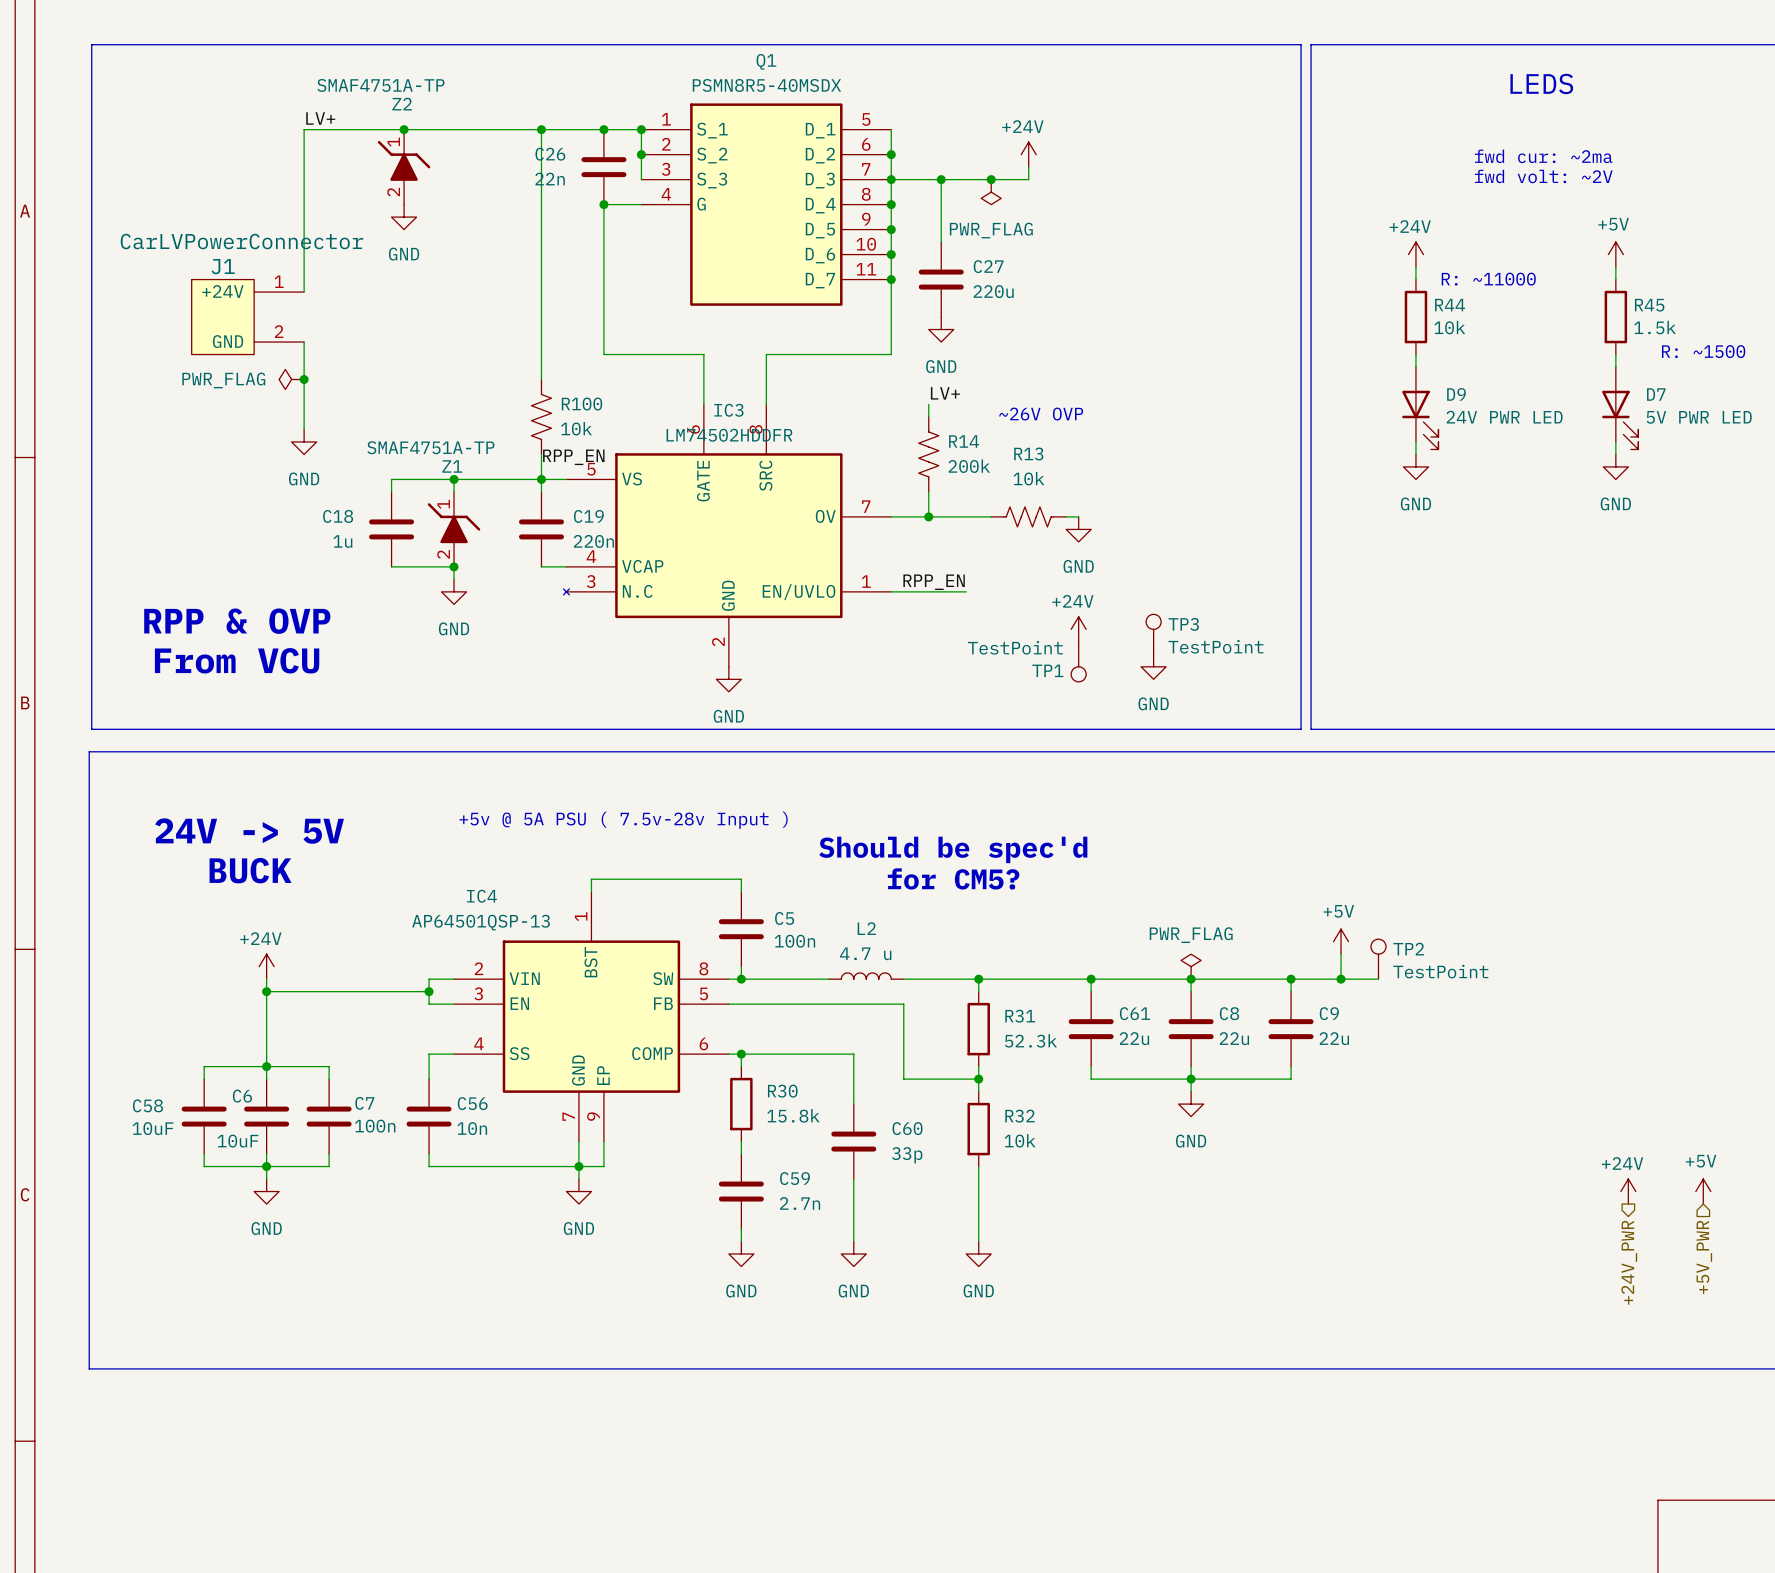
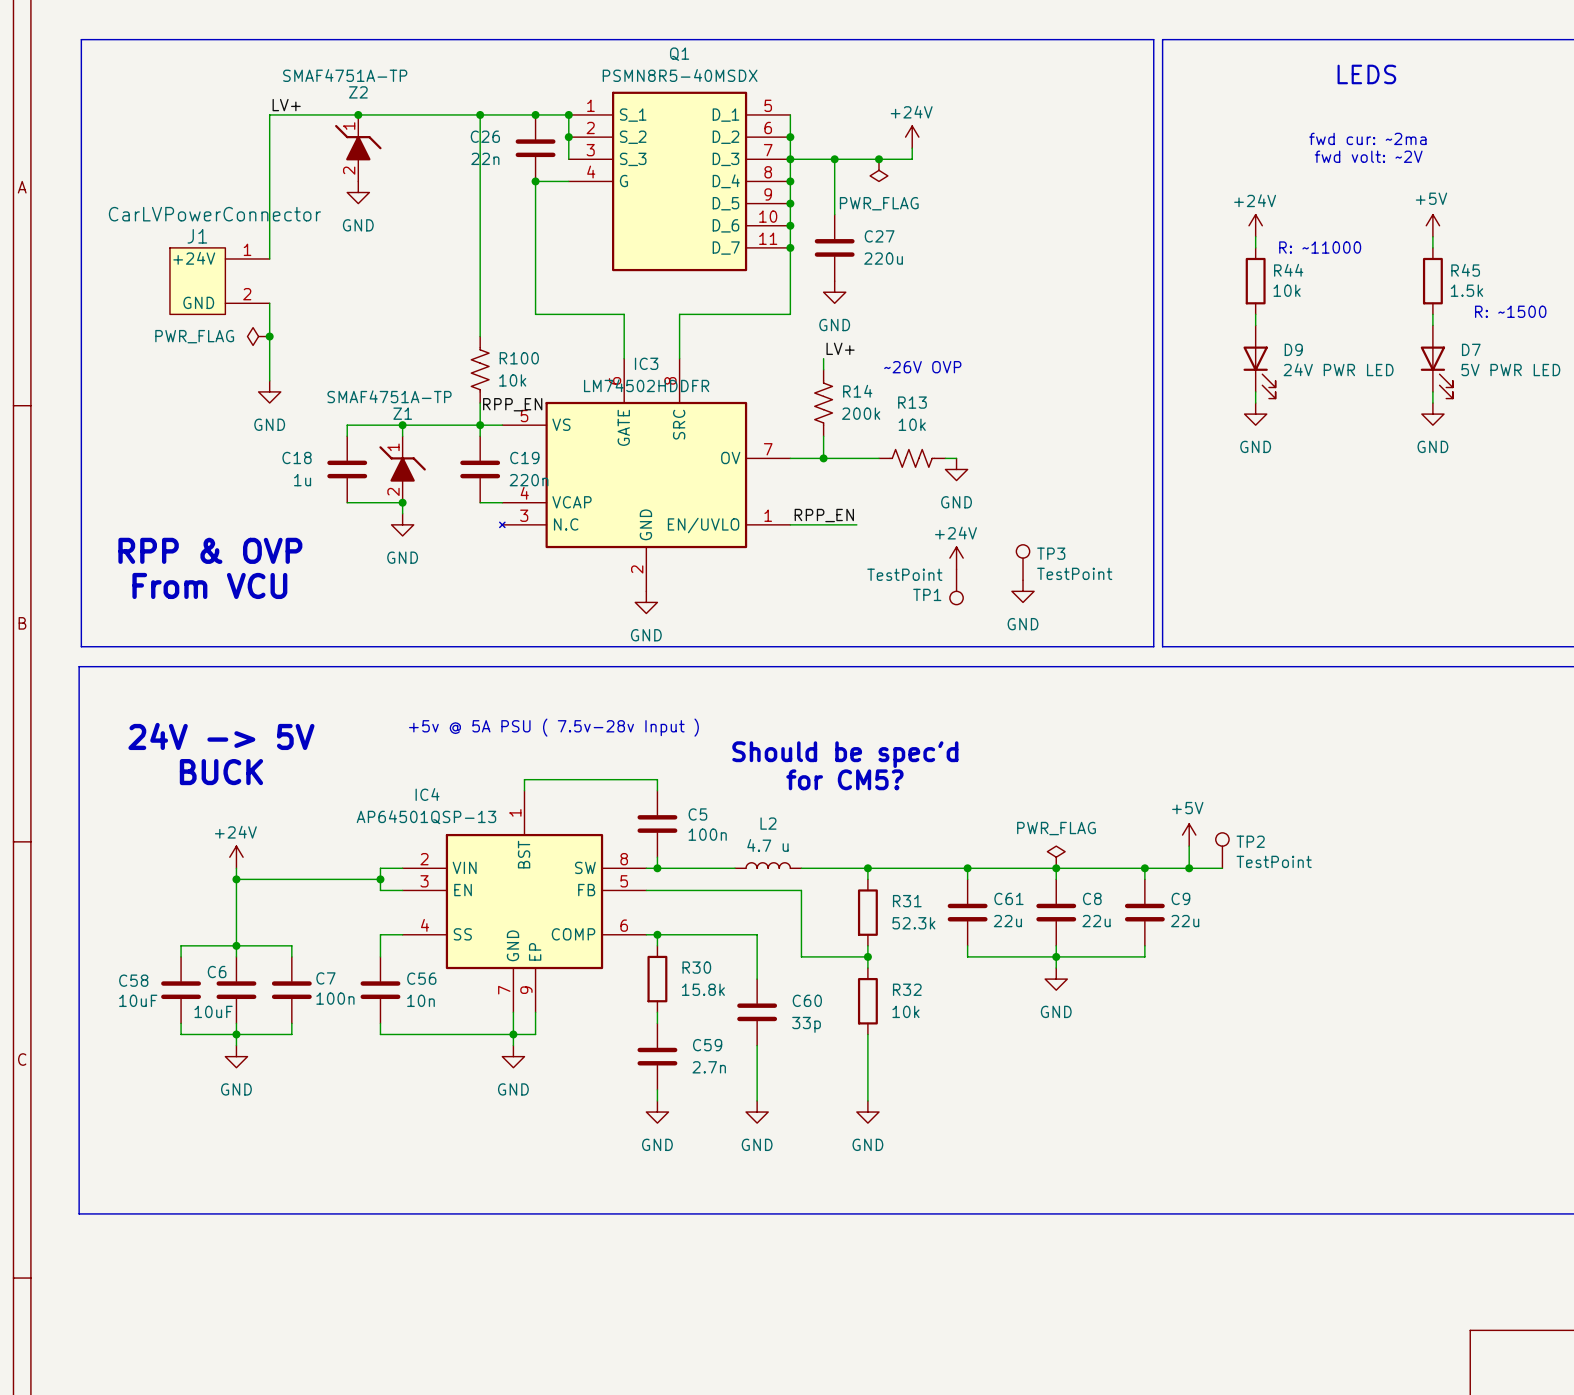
power symbol: +24V (1628, 1191) -> none
power symbol: +5V (1703, 1191) -> none
hierarchical label: +5V_PWR (1704, 1257) -> none
hierarchical label: +24V_PWR (1629, 1262) -> none

